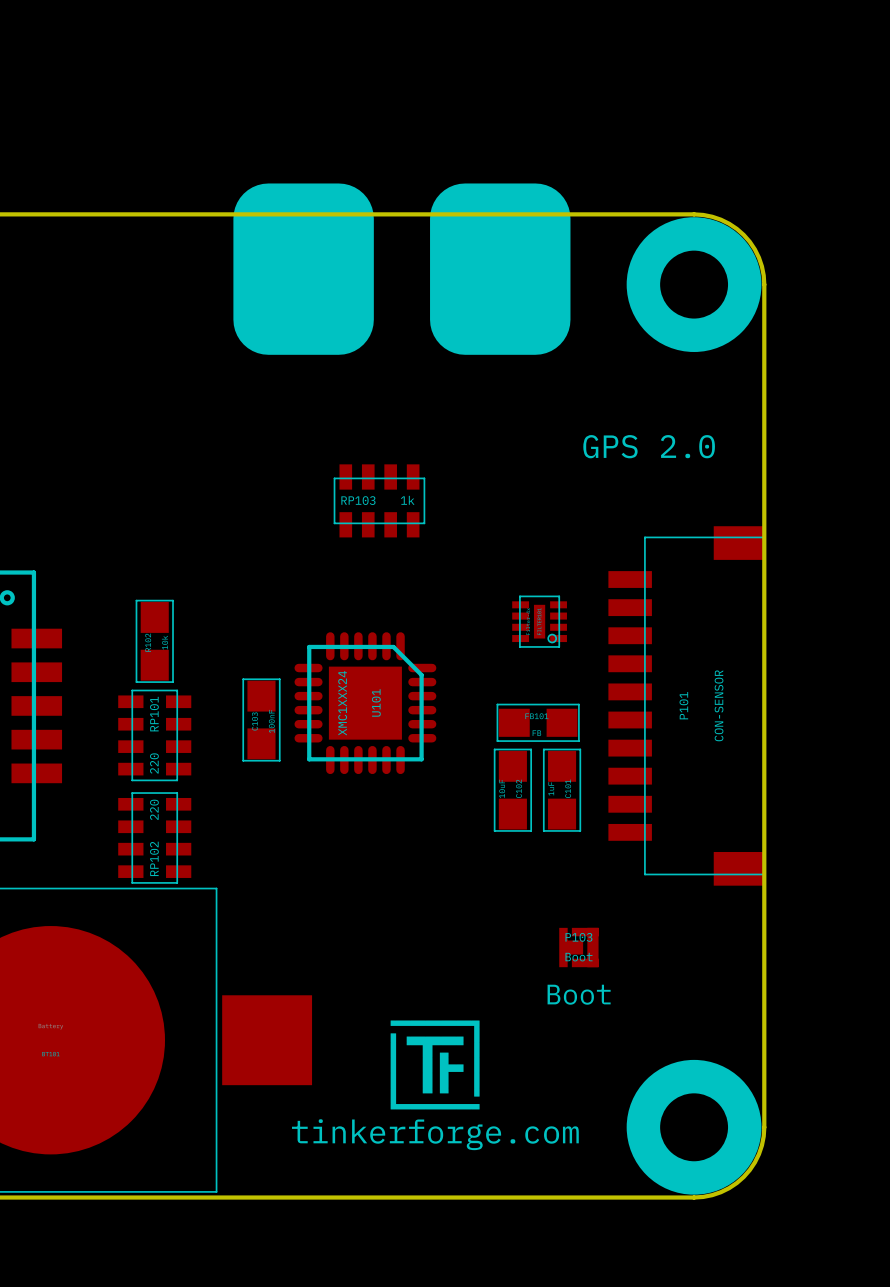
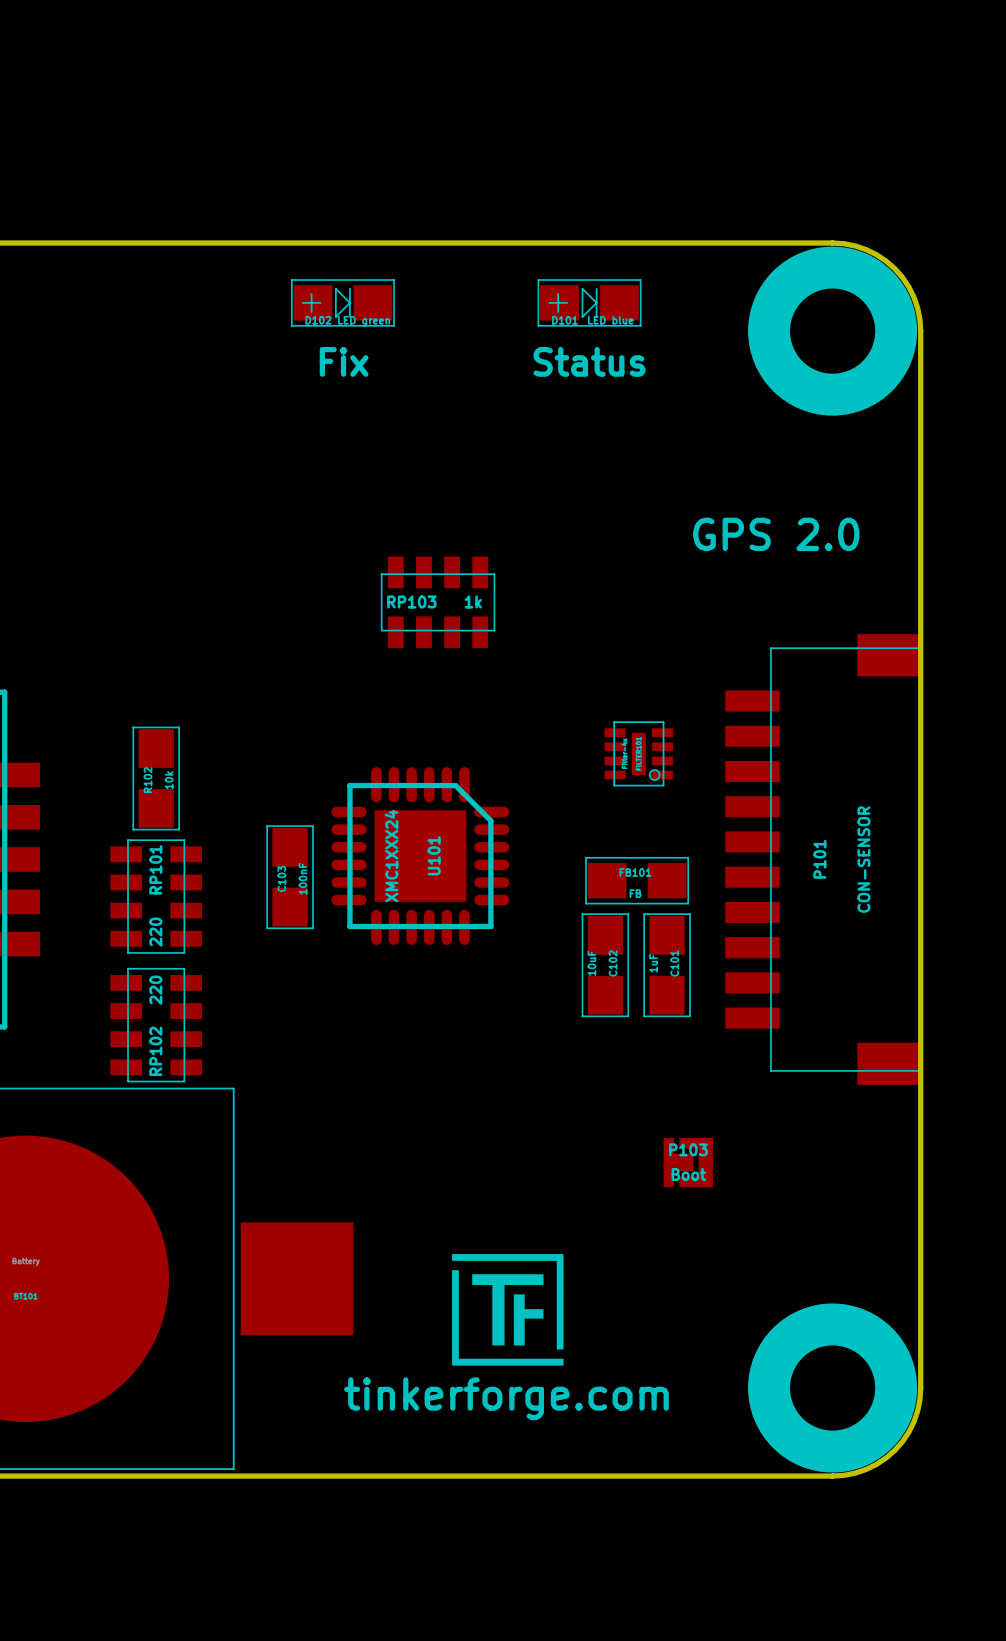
drawing: [233, 183, 374, 355] -> none
drawing: [430, 183, 571, 355] -> none
text: none -> Fix (344, 361)
text: none -> Status (589, 361)
text: Boot (579, 994) -> none

